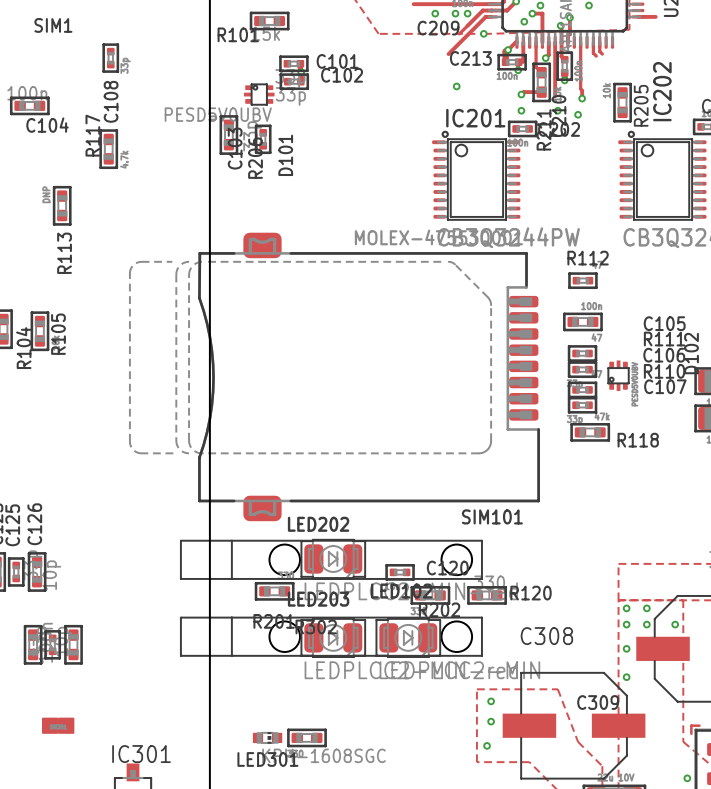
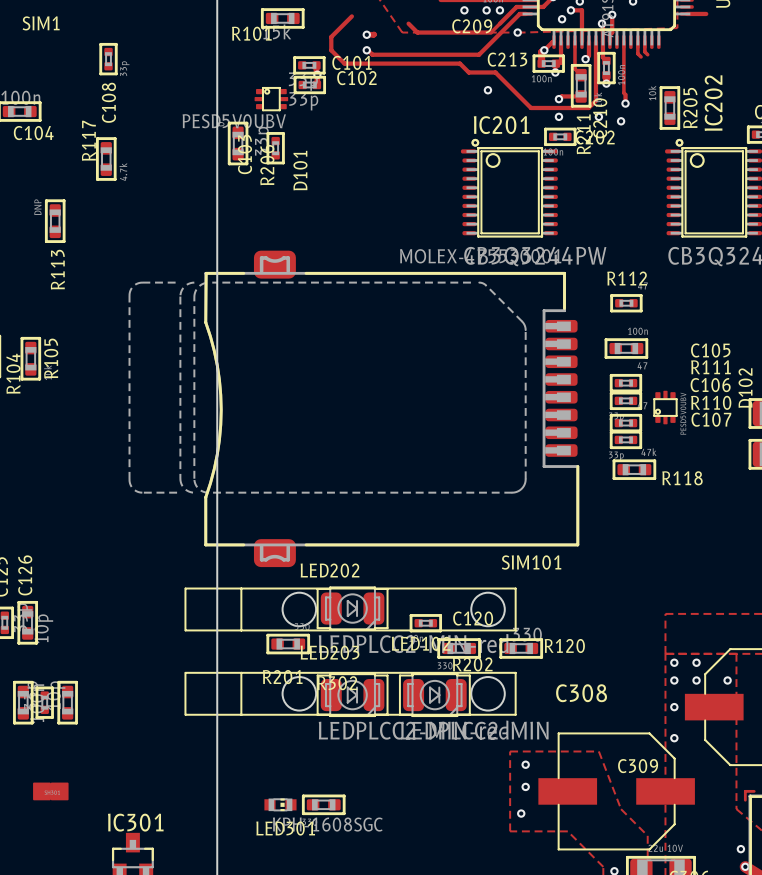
track: none -> (351, 16) (331, 36) (331, 50) (344, 63) (459, 63) (468, 72) (495, 72) (531, 107) (588, 107) (595, 100)
track: none -> (408, 23) (417, 32) (491, 32)
track: none -> (366, 34) (374, 34)
via: none -> (366, 34)
track: none -> (366, 50) (372, 54) (479, 54)
via: none -> (366, 50)

